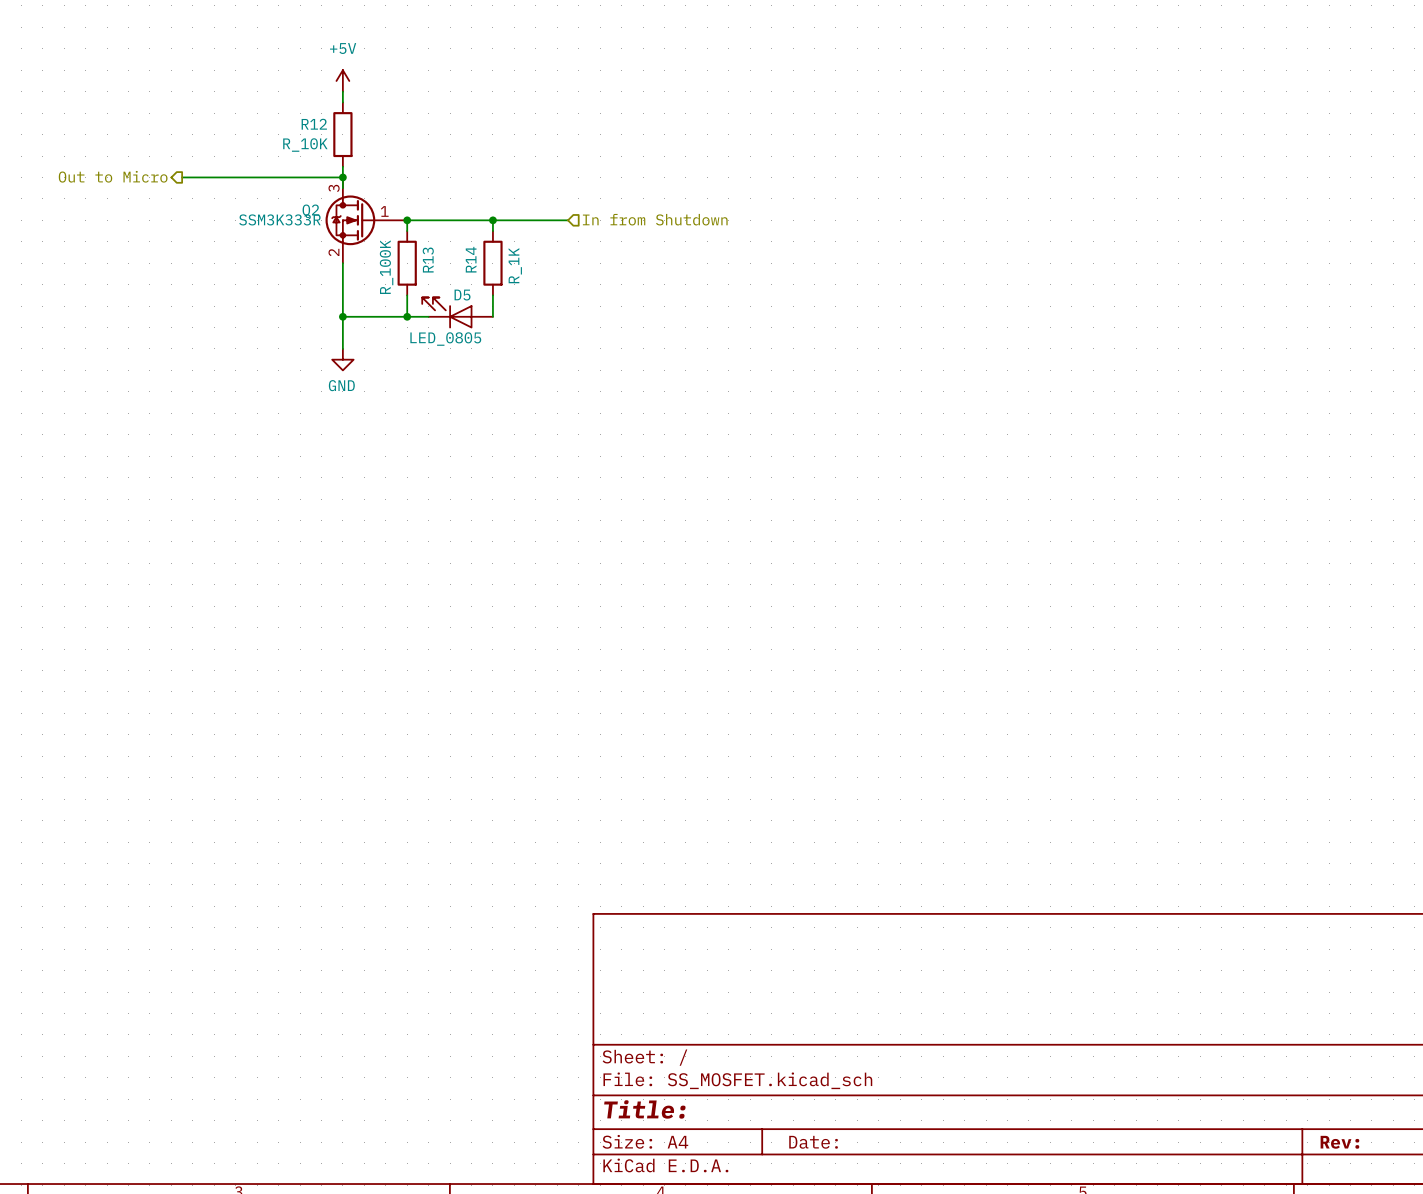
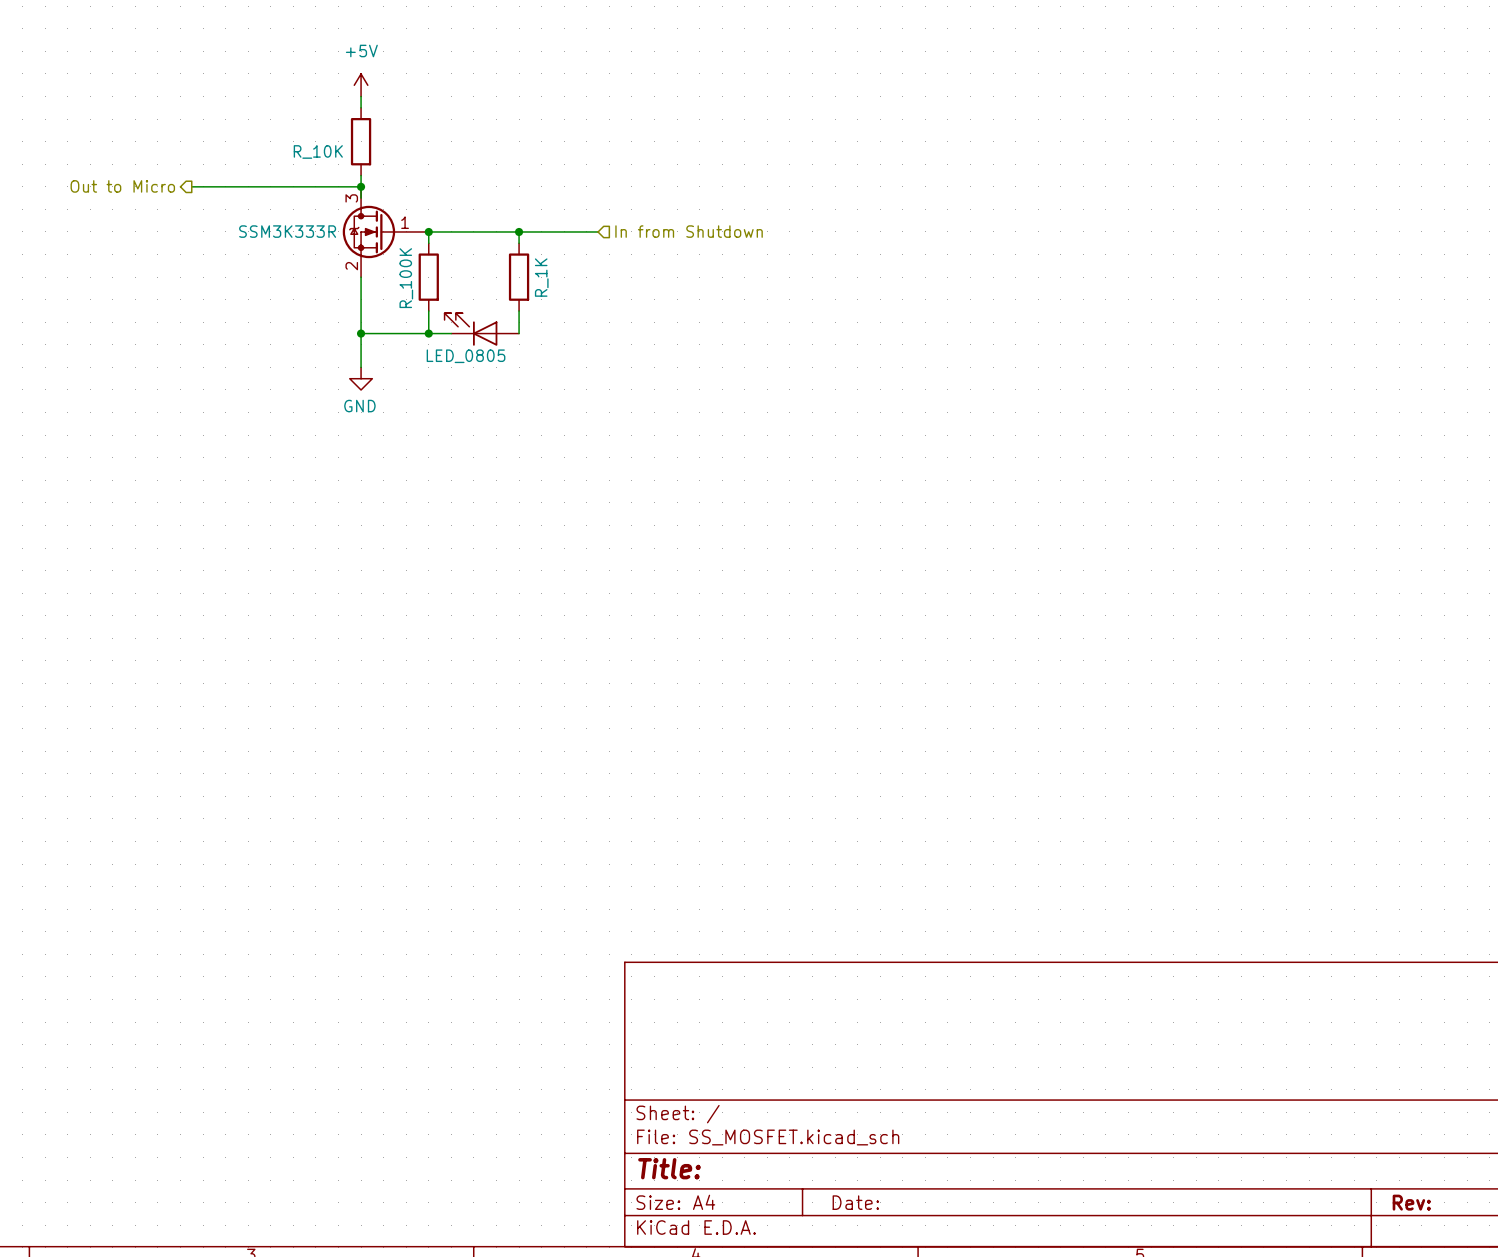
R12 name: R12 (314, 124) -> none
Q2 name: Q2 (310, 211) -> none
R14 name: R14 (471, 259) -> none
R13 name: R13 (428, 260) -> none
D5 name: D5 (462, 295) -> none

